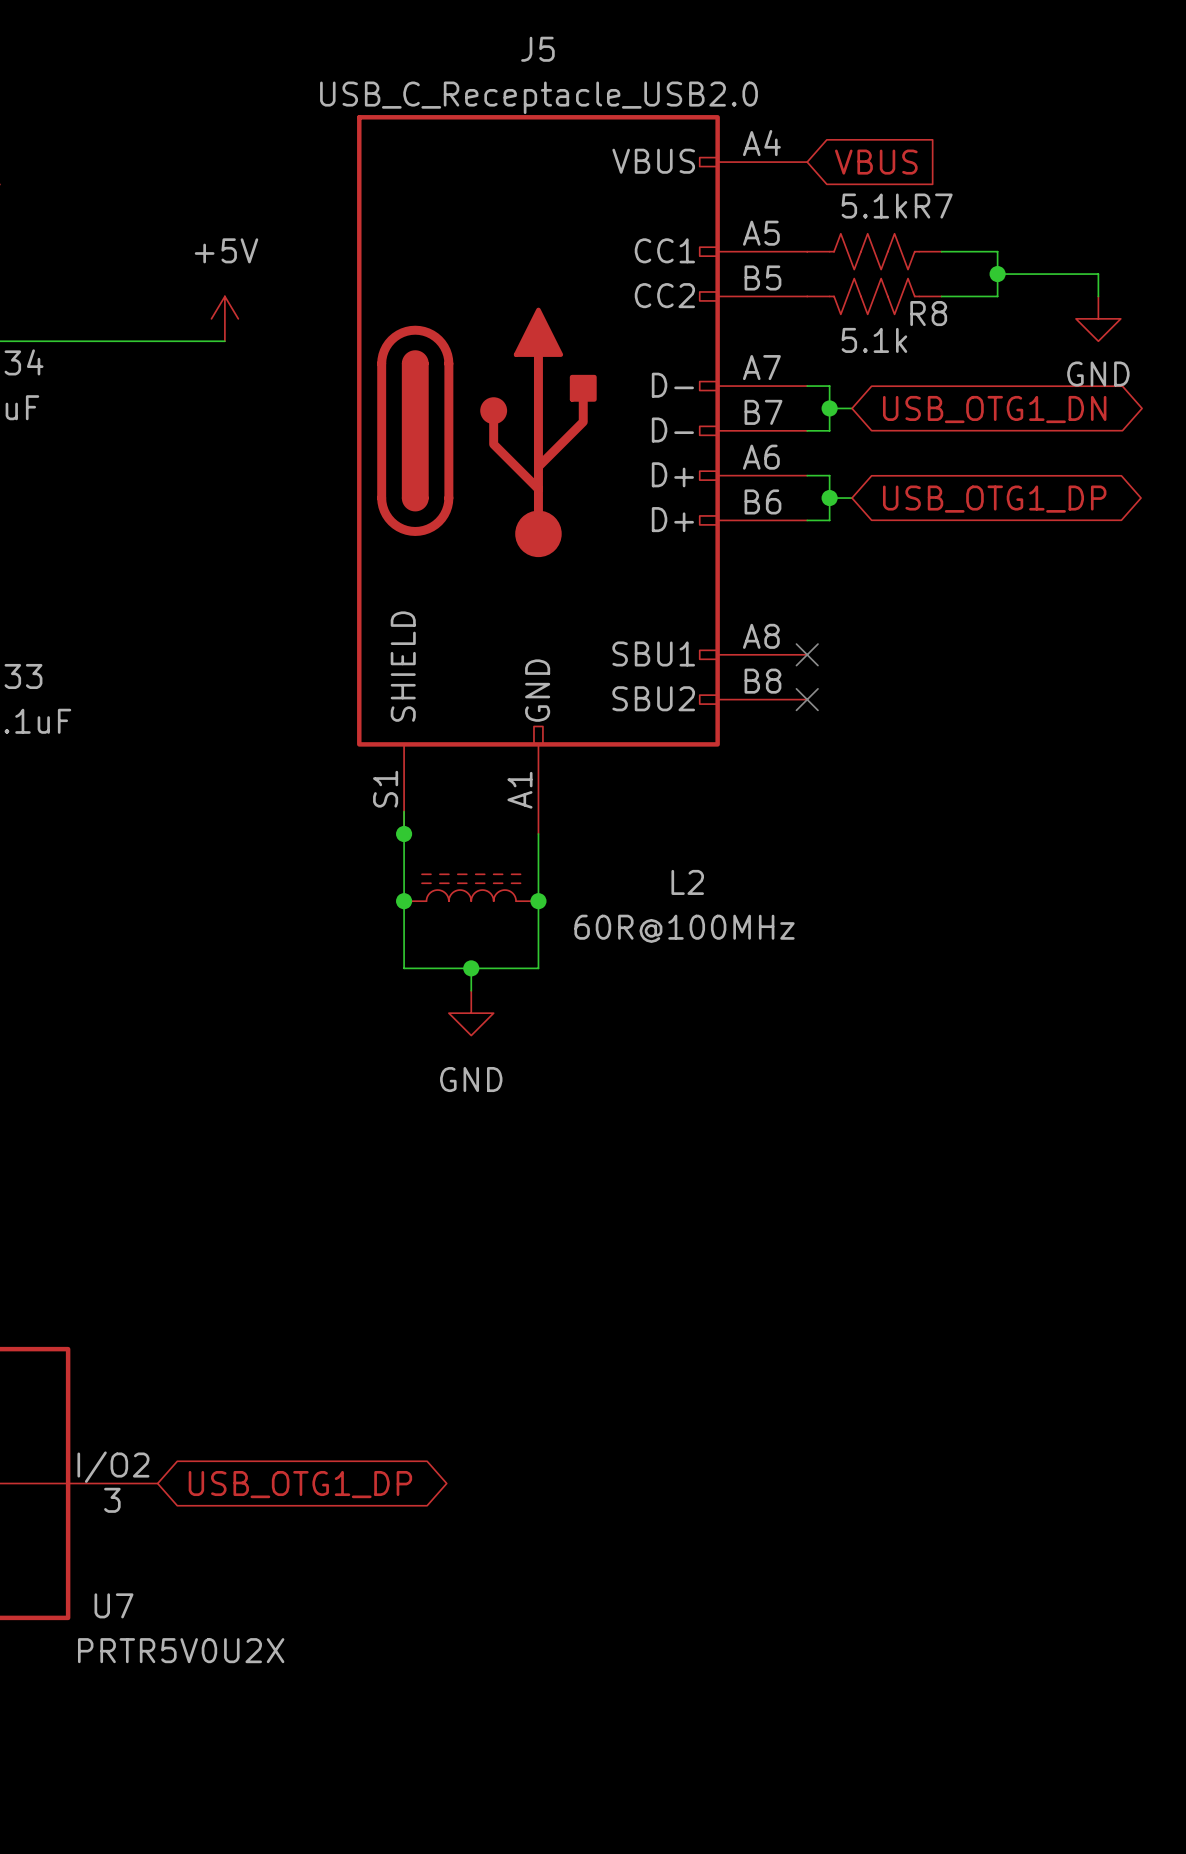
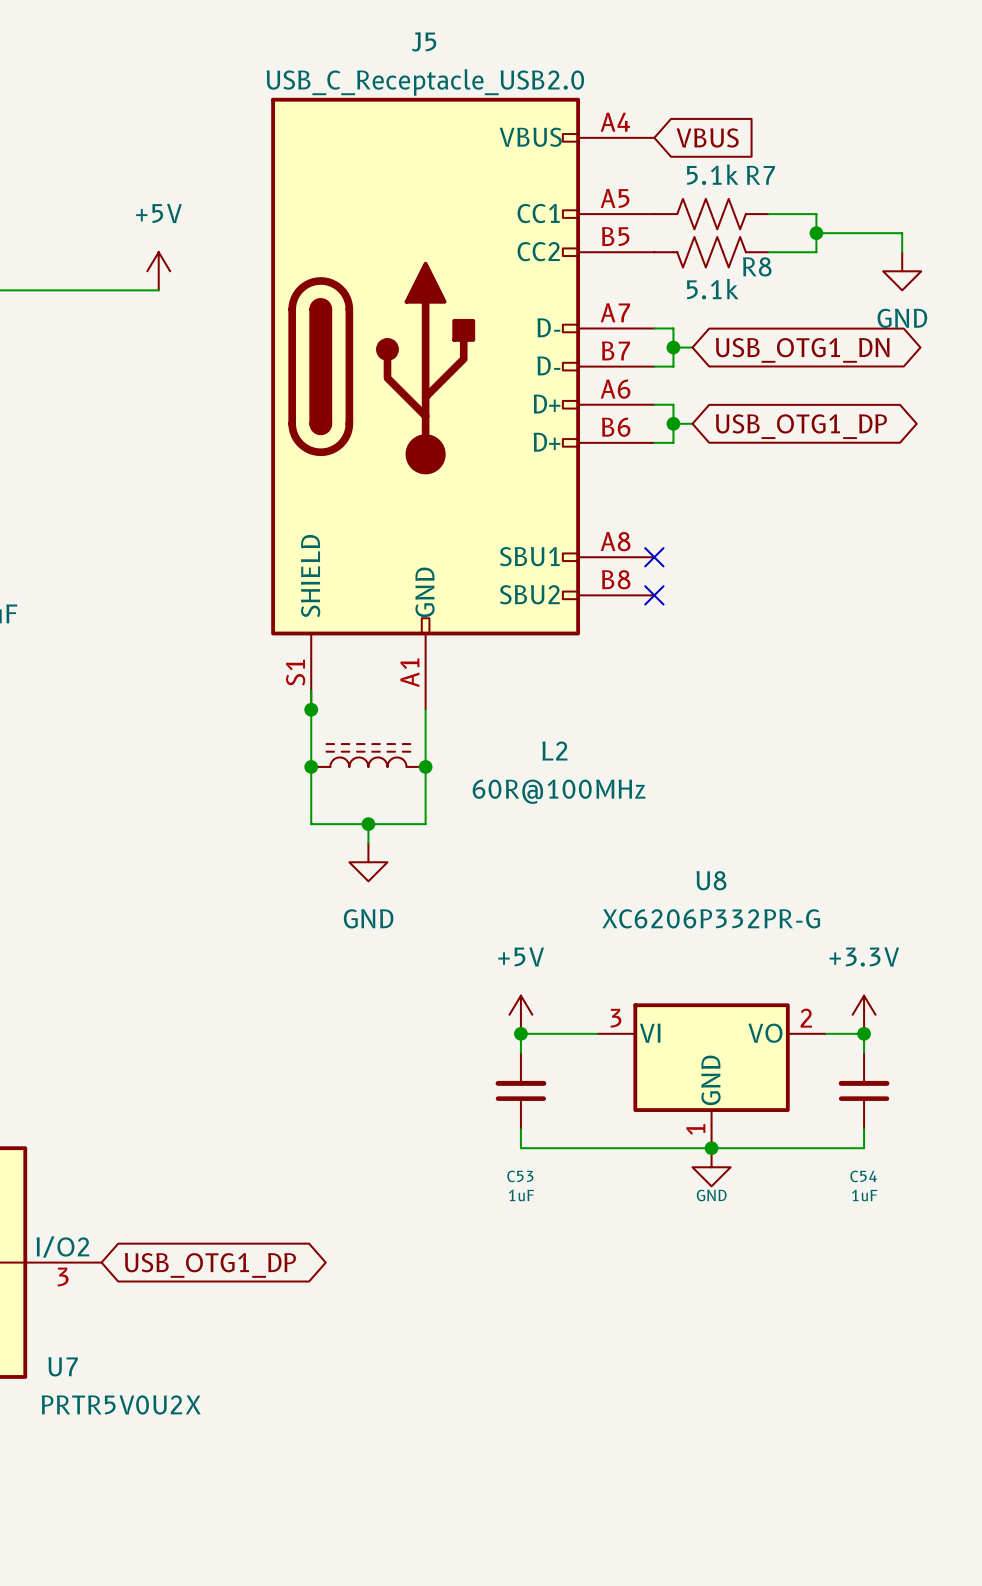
power symbol: none -> +5V (520, 1014)
power symbol: none -> +3.3V (864, 1014)
junction: none -> (520, 1033)
wire: none -> (597, 1033) (520, 1033) (520, 1052)
wire: none -> (825, 1033) (864, 1033) (864, 1052)
junction: none -> (864, 1033)
U8: none -> XC6206P332PR-G (711, 1075)
C53: none -> 1uF (520, 1091)
C54: none -> 1uF (864, 1091)
wire: none -> (520, 1129) (520, 1148) (864, 1148) (864, 1129)
junction: none -> (711, 1148)
power symbol: none -> GND (711, 1167)

